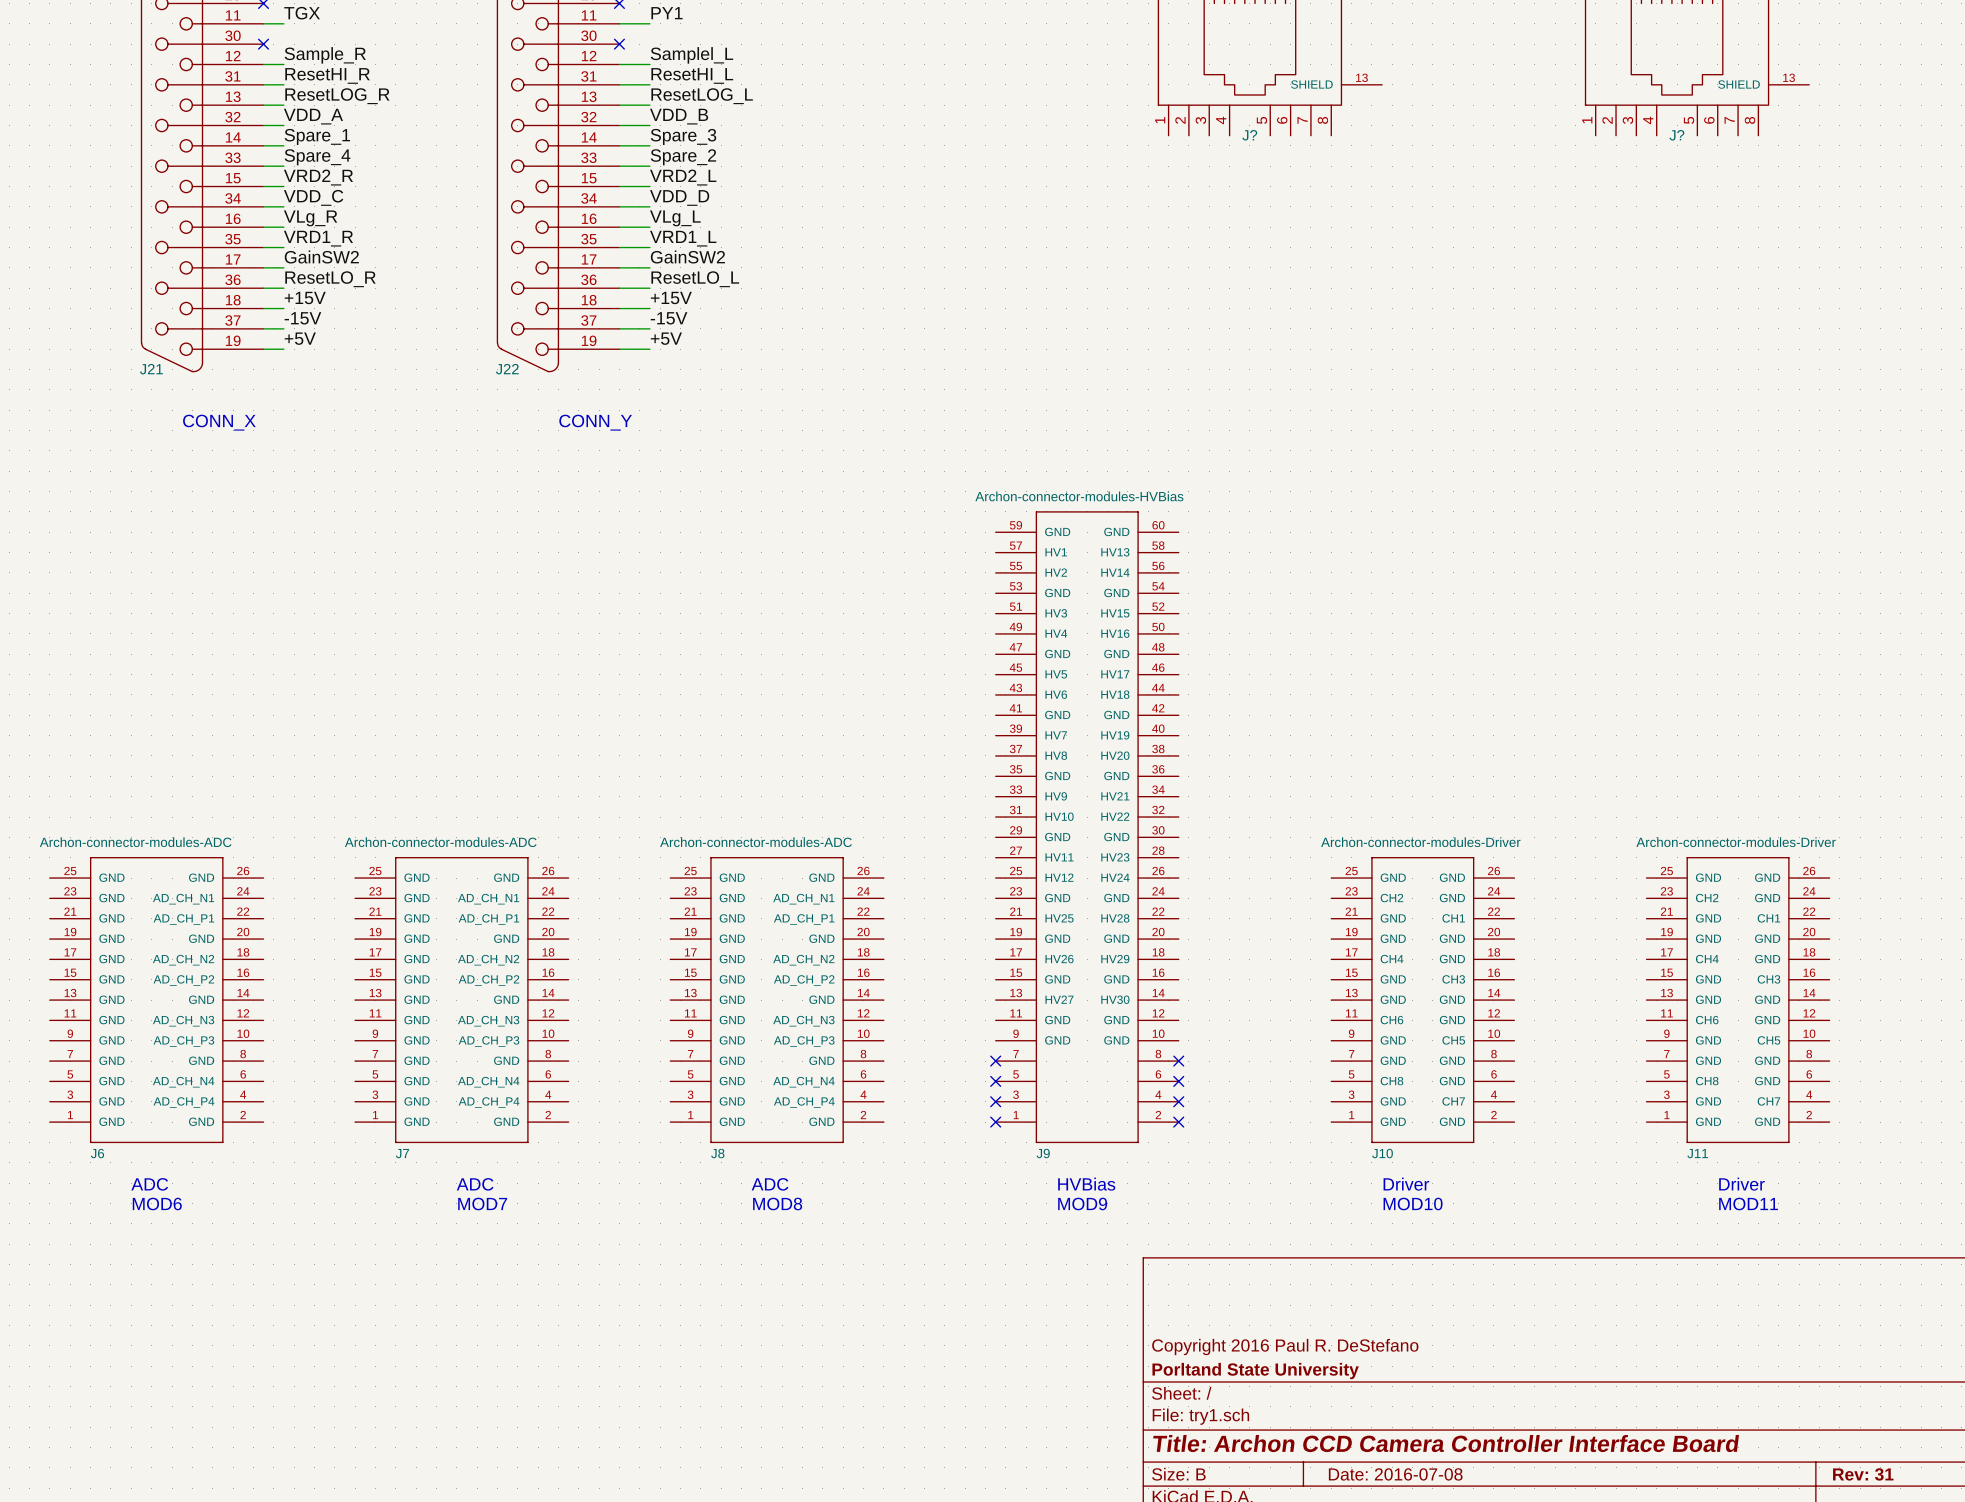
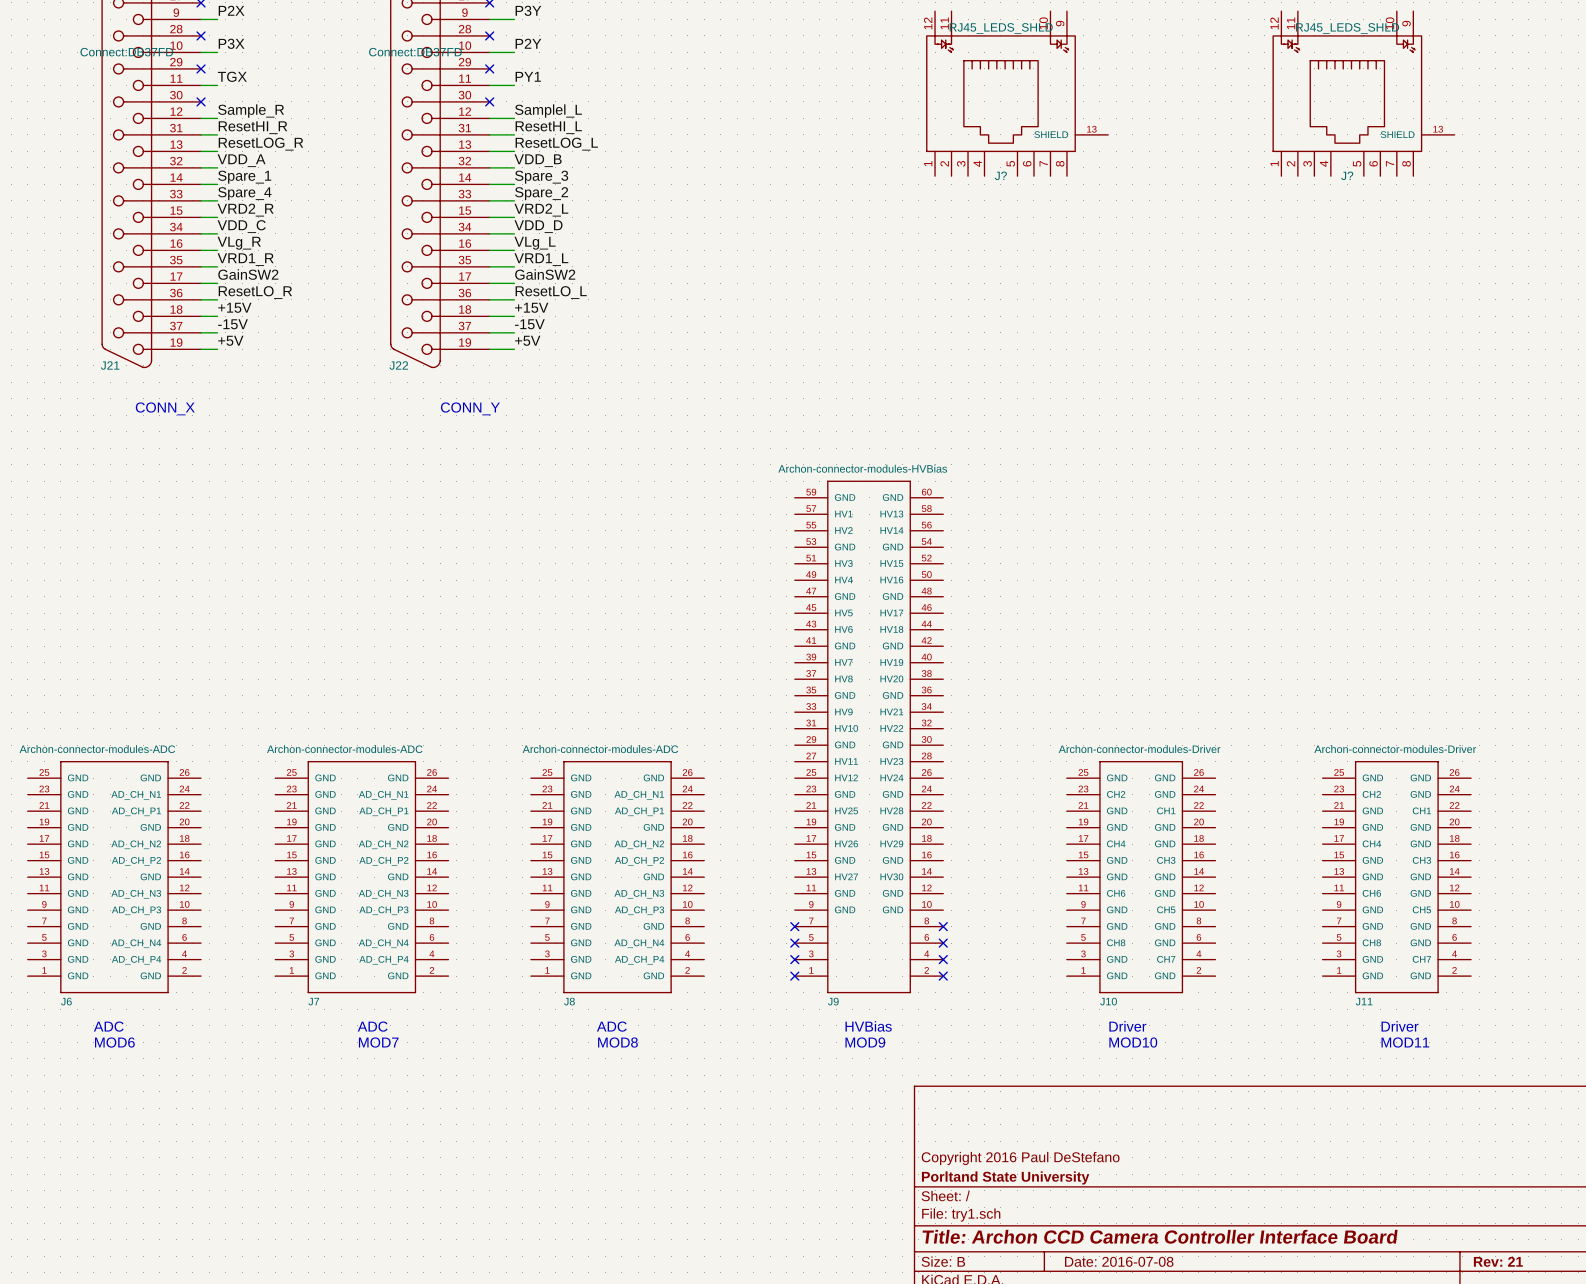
title block: Copyright 2016 Paul R. DeStefano (1285, 1347) -> Copyright 2016 Paul DeStefano (1020, 1158)
title block: Rev: 31 (1863, 1474) -> Rev: 21 (1498, 1261)

